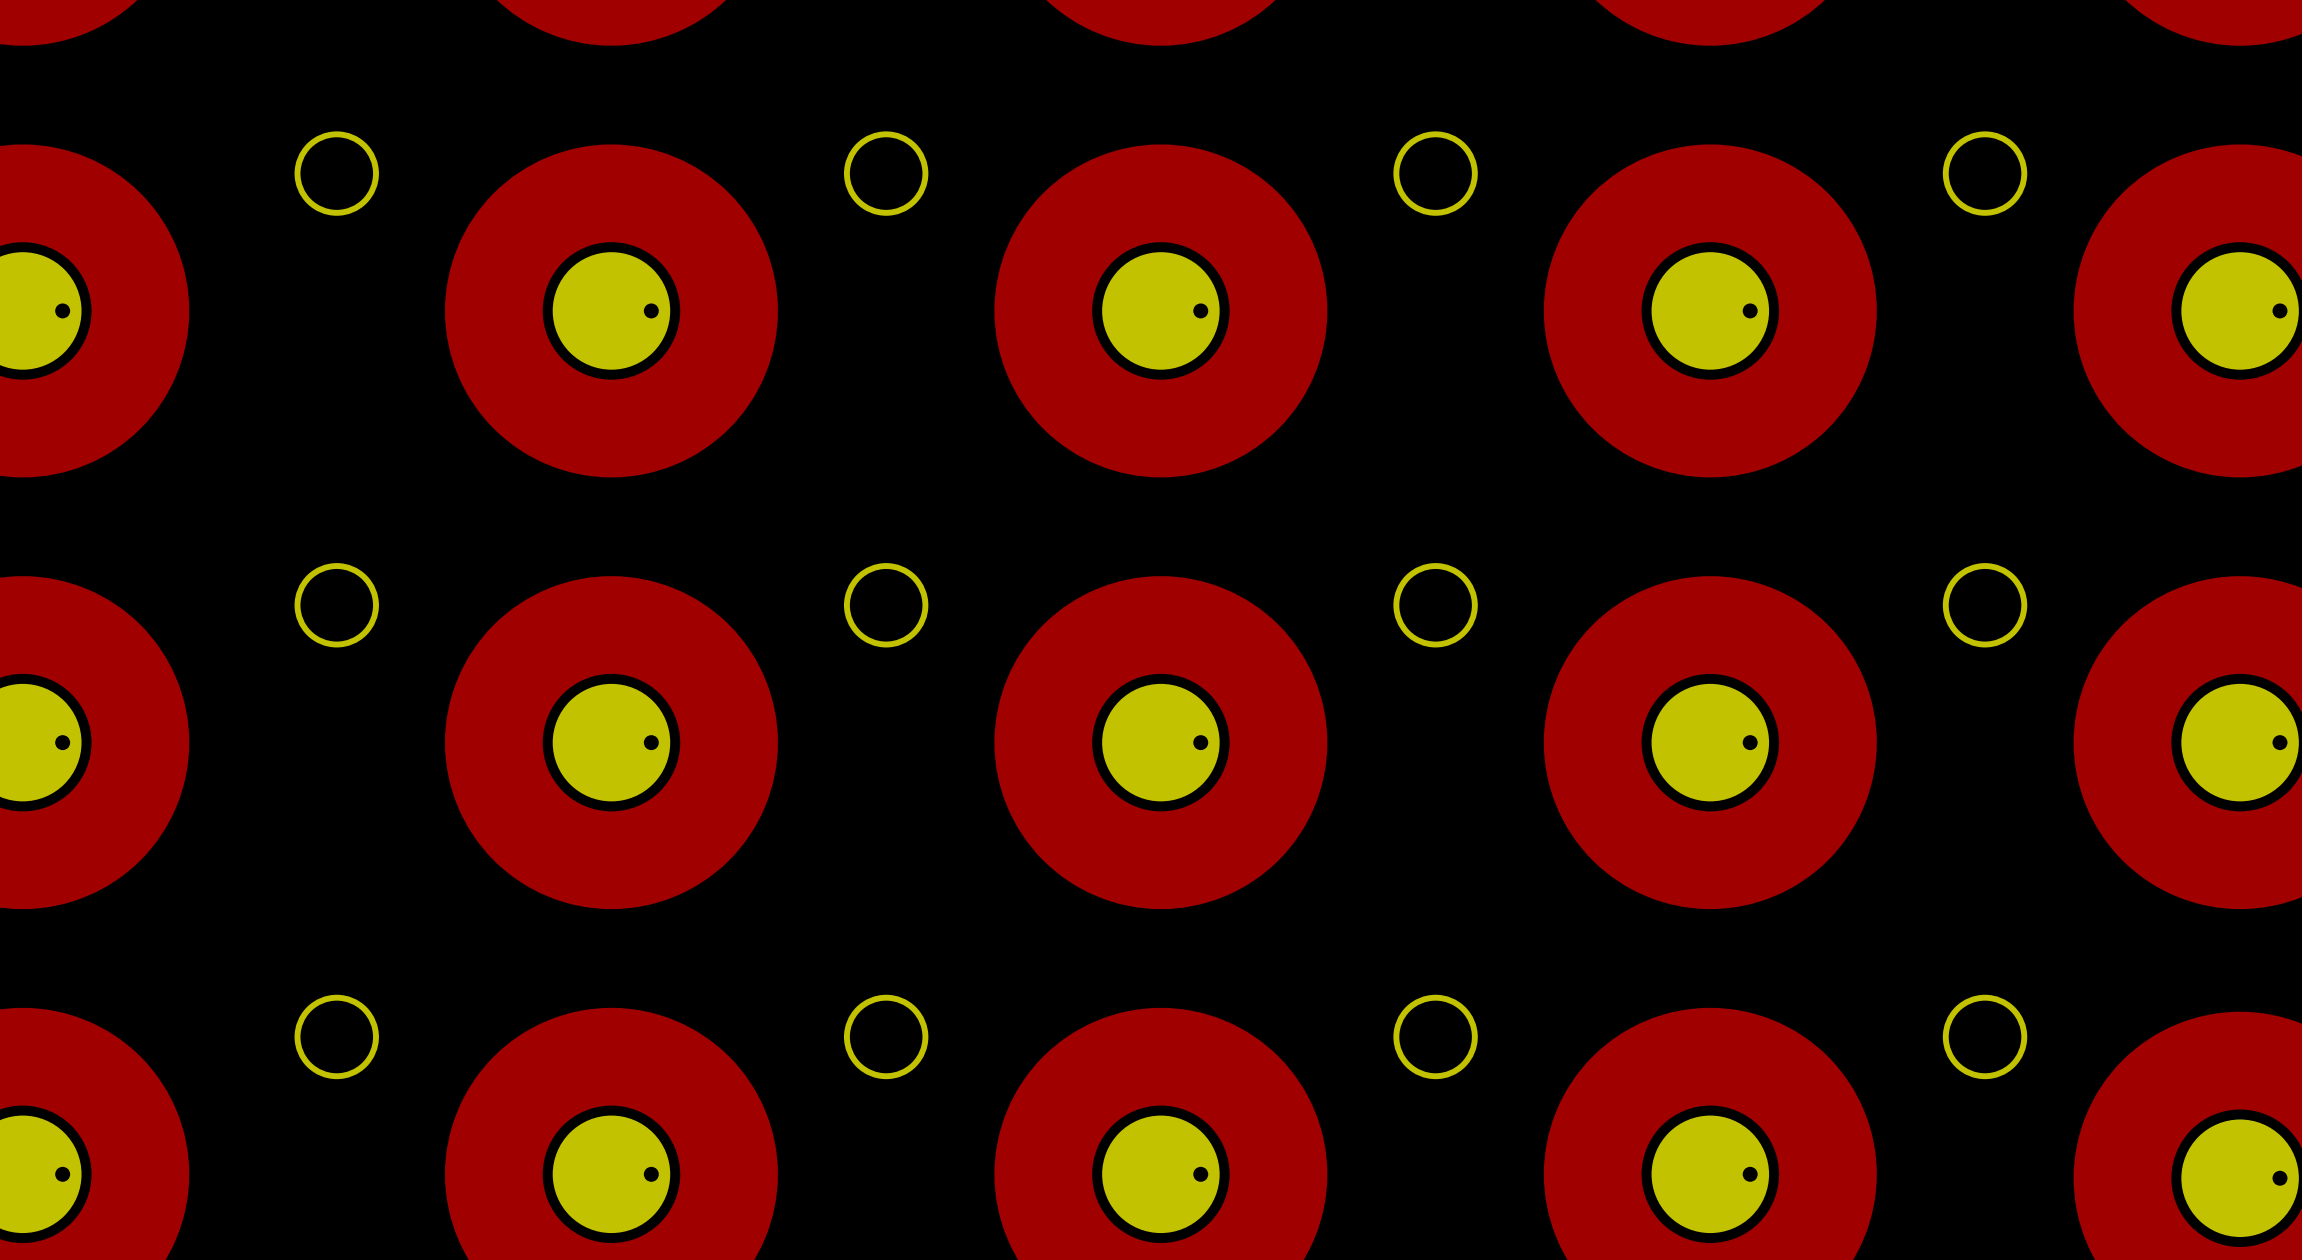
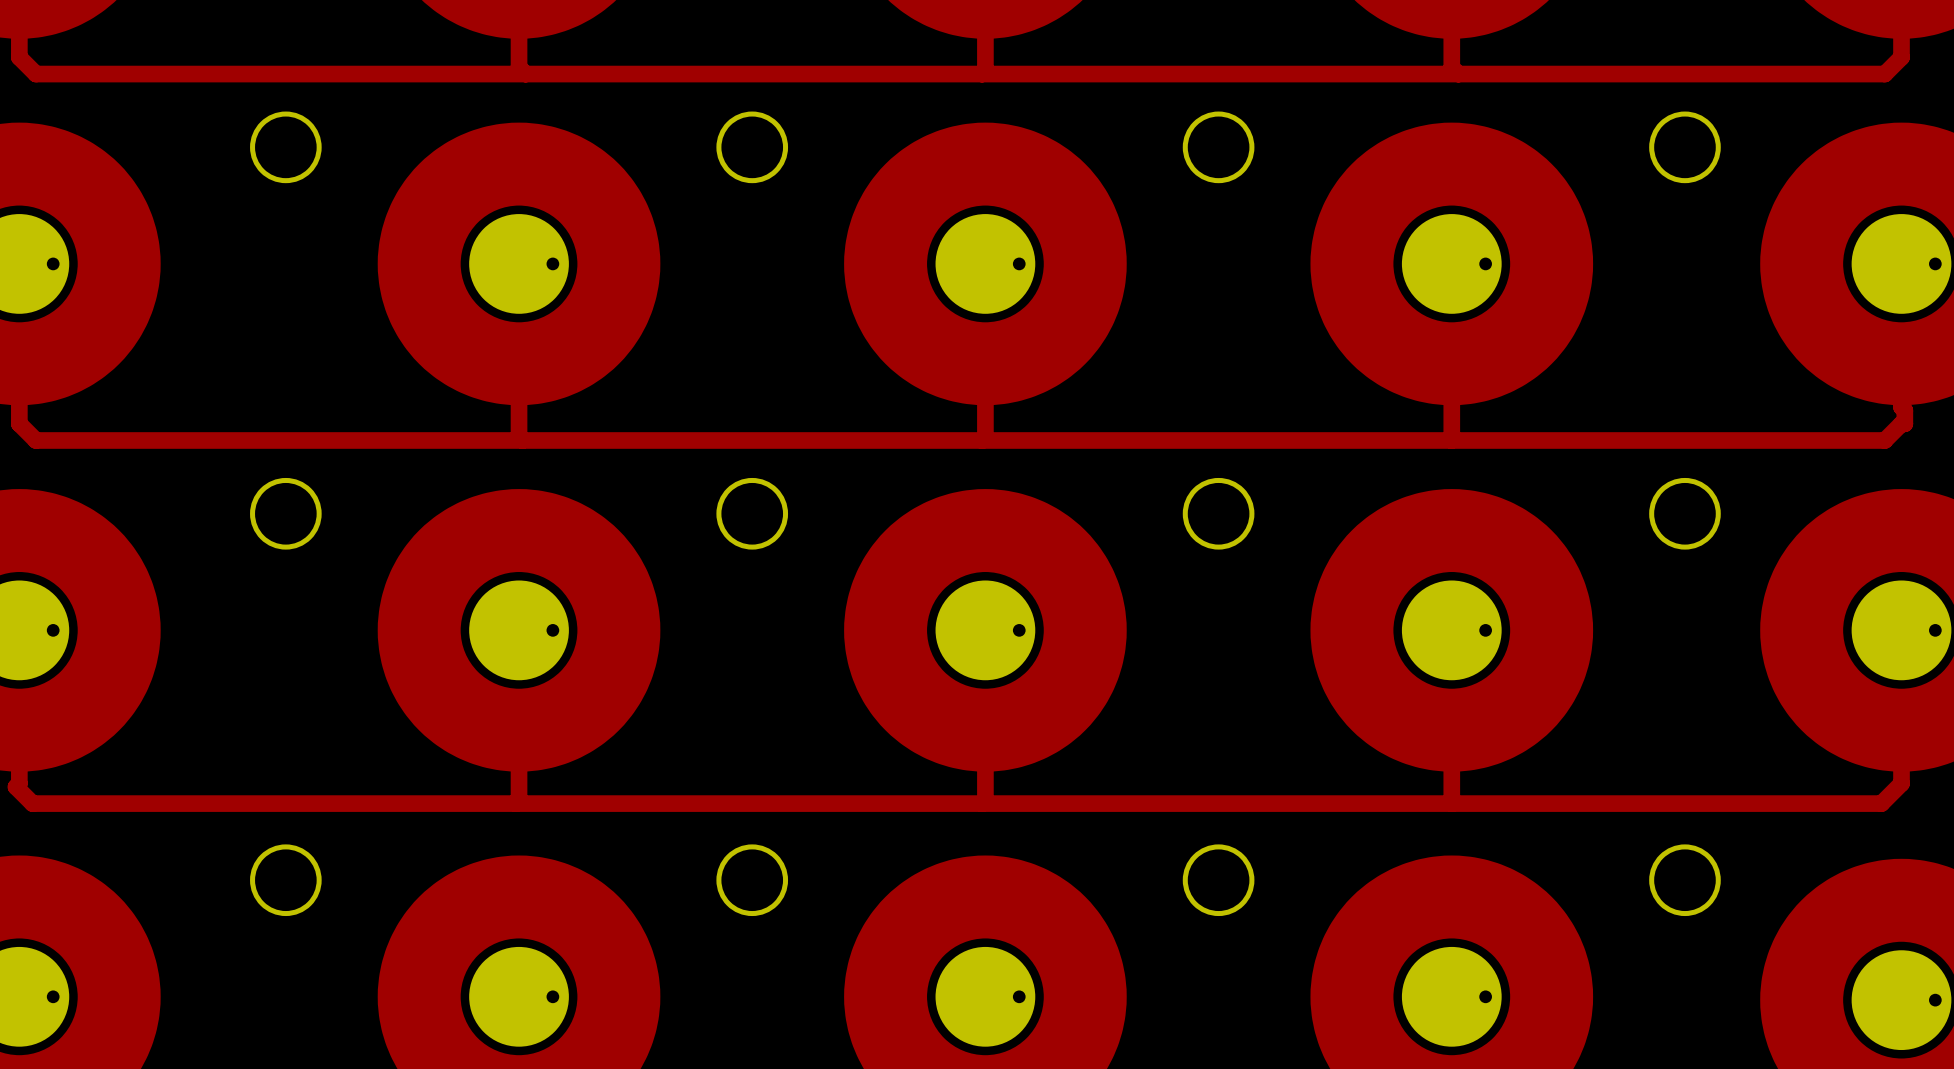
track: none -> (19, 24) (19, 57) (36, 74) (1884, 74) (1901, 57) (1901, 24)
track: none -> (519, 24) (519, 67) (525, 74)
track: none -> (985, 24) (985, 70) (982, 74)
track: none -> (1451, 24) (1451, 67) (1458, 74)
track: none -> (19, 390) (19, 423) (36, 440) (1884, 440) (1901, 423) (1904, 423) (1904, 410) (1901, 407) (1901, 390)
track: none -> (519, 390) (519, 437) (522, 440)
track: none -> (985, 390) (985, 437) (982, 440)
track: none -> (1451, 390) (1451, 440)
track: none -> (19, 756) (19, 783) (16, 786) (32, 803) (1881, 803) (1901, 783) (1901, 756)
track: none -> (519, 756) (519, 800) (515, 803)
track: none -> (985, 756) (985, 800) (982, 803)
track: none -> (1451, 756) (1451, 803)

